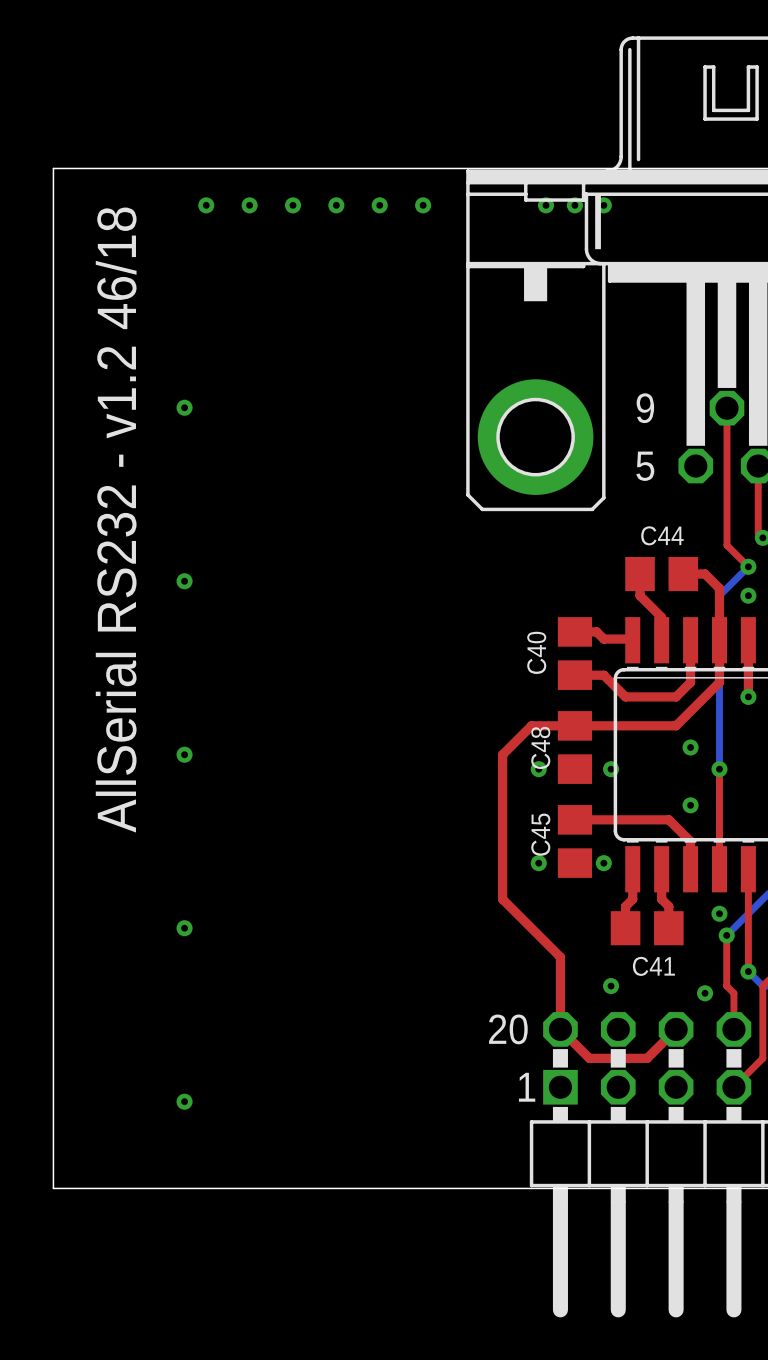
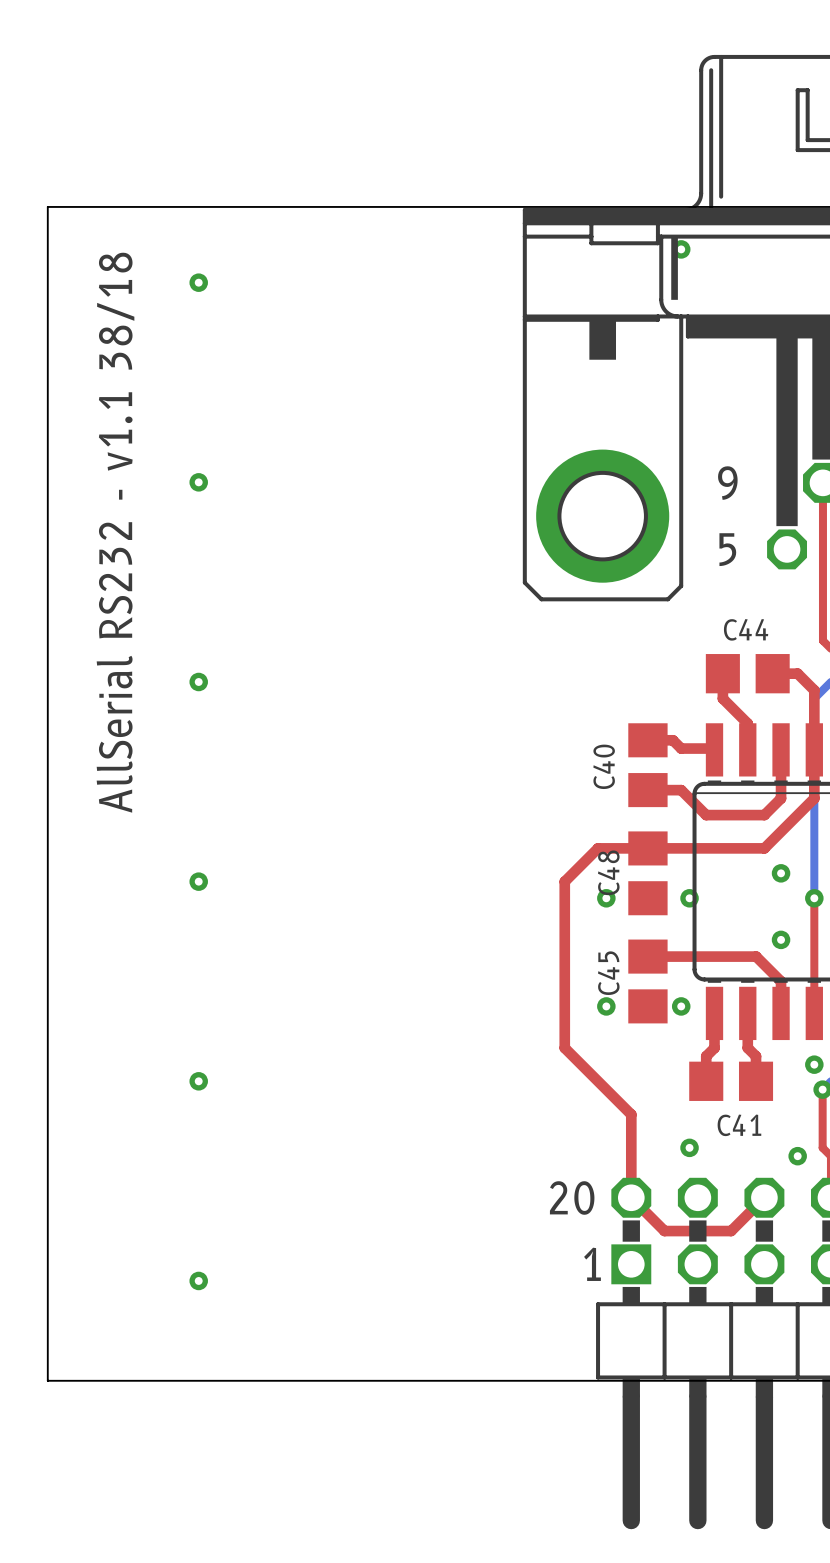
via: (206, 205) -> none
via: (249, 205) -> none
via: (292, 205) -> none
via: (336, 205) -> none
via: (379, 205) -> none
via: (423, 205) -> none
via: (546, 205) -> none
via: (574, 205) -> none
via: none -> (198, 282)
text: AllSerial RS232 - v1.2 46/18 (116, 520) -> AllSerial RS232 - v1.1 38/18 (115, 532)

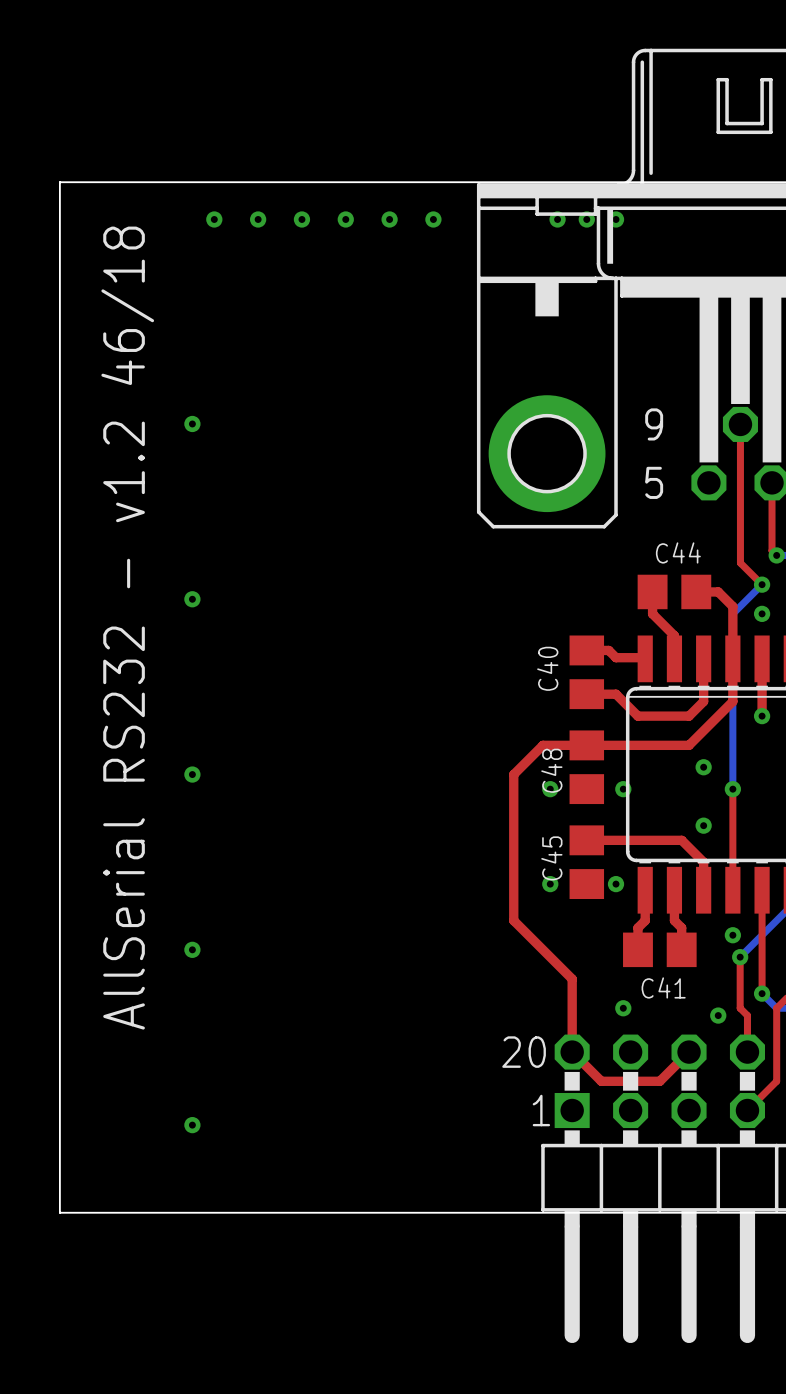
via: none -> (214, 219)
via: none -> (258, 219)
via: none -> (301, 219)
via: none -> (345, 219)
via: none -> (389, 219)
via: none -> (433, 219)
via: none -> (557, 219)
via: none -> (586, 219)
via: (198, 282) -> none
text: AllSerial RS232 - v1.1 38/18 (115, 532) -> AllSerial RS232 - v1.2 46/18 (127, 628)

